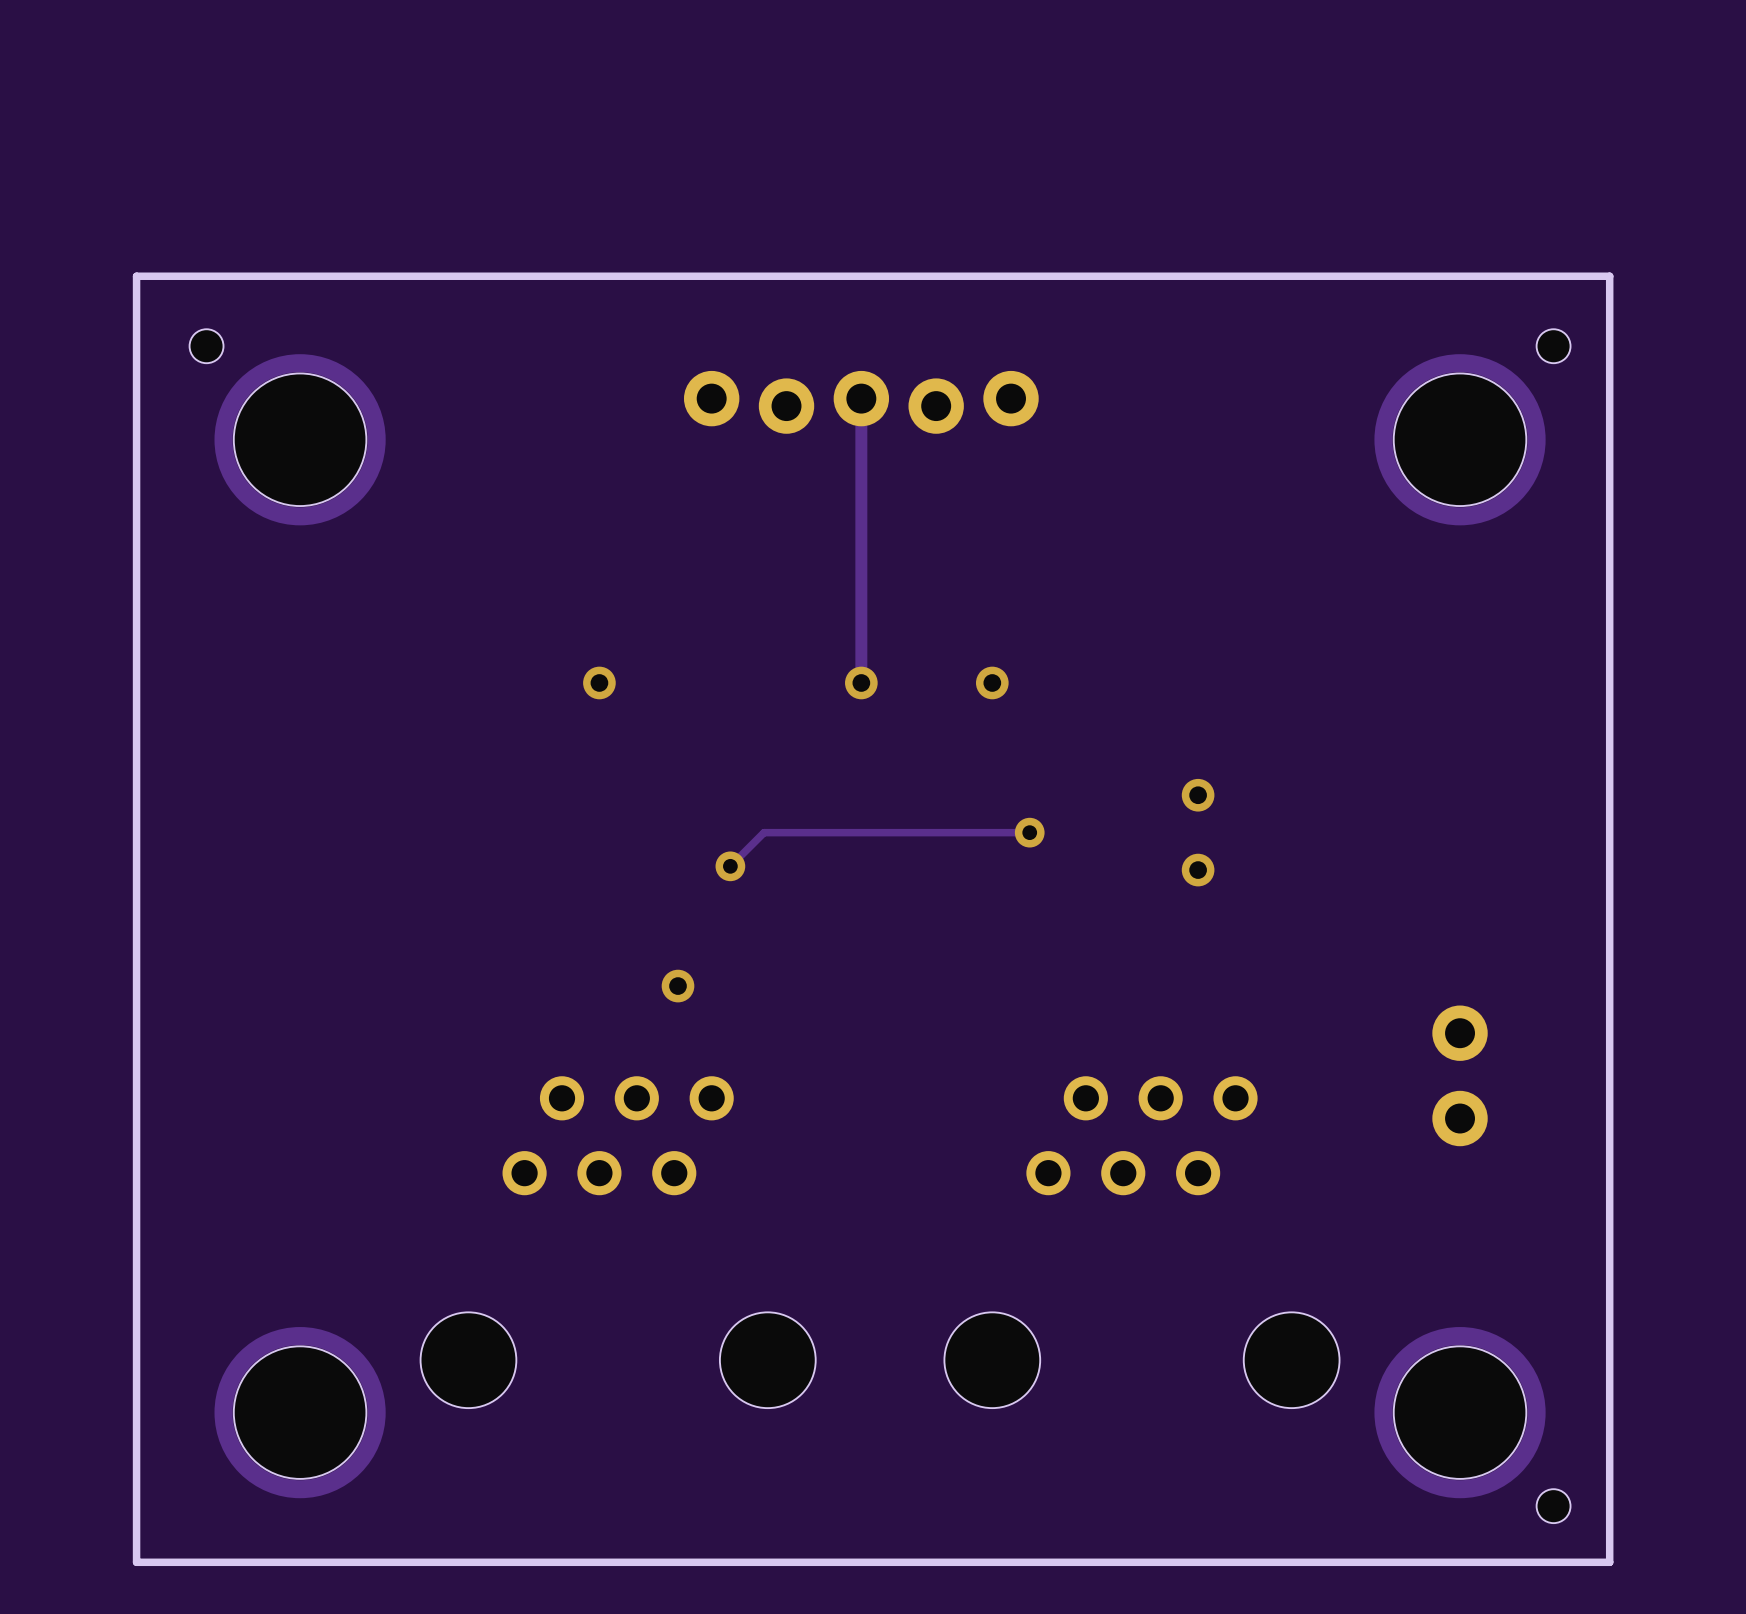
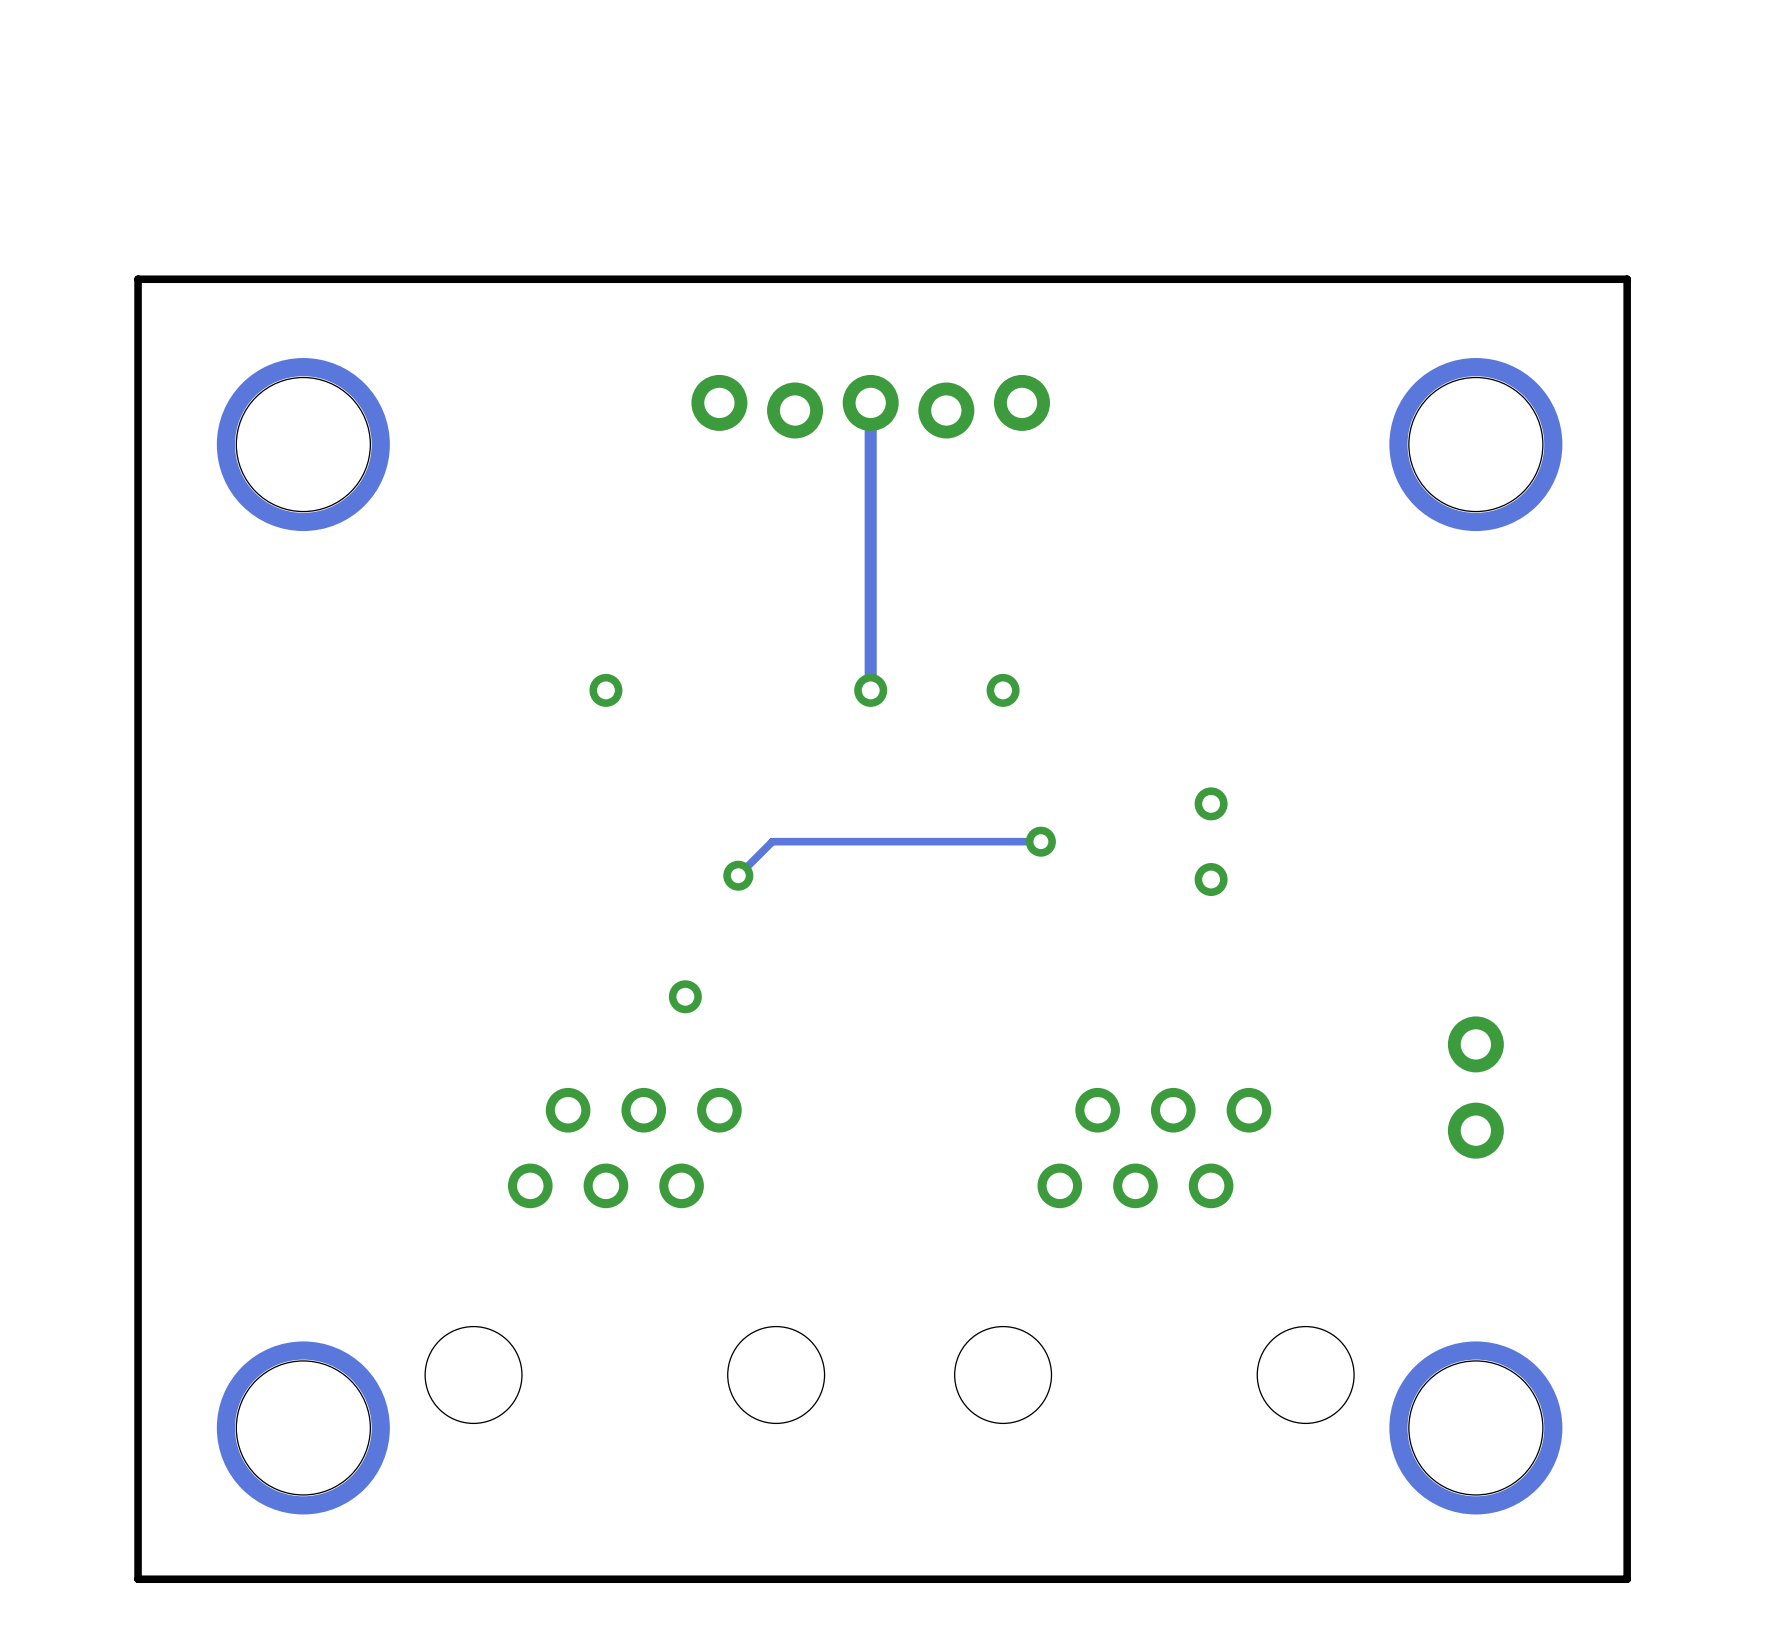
part: (206, 346) -> none
part: (1553, 346) -> none
part: (1553, 1506) -> none

